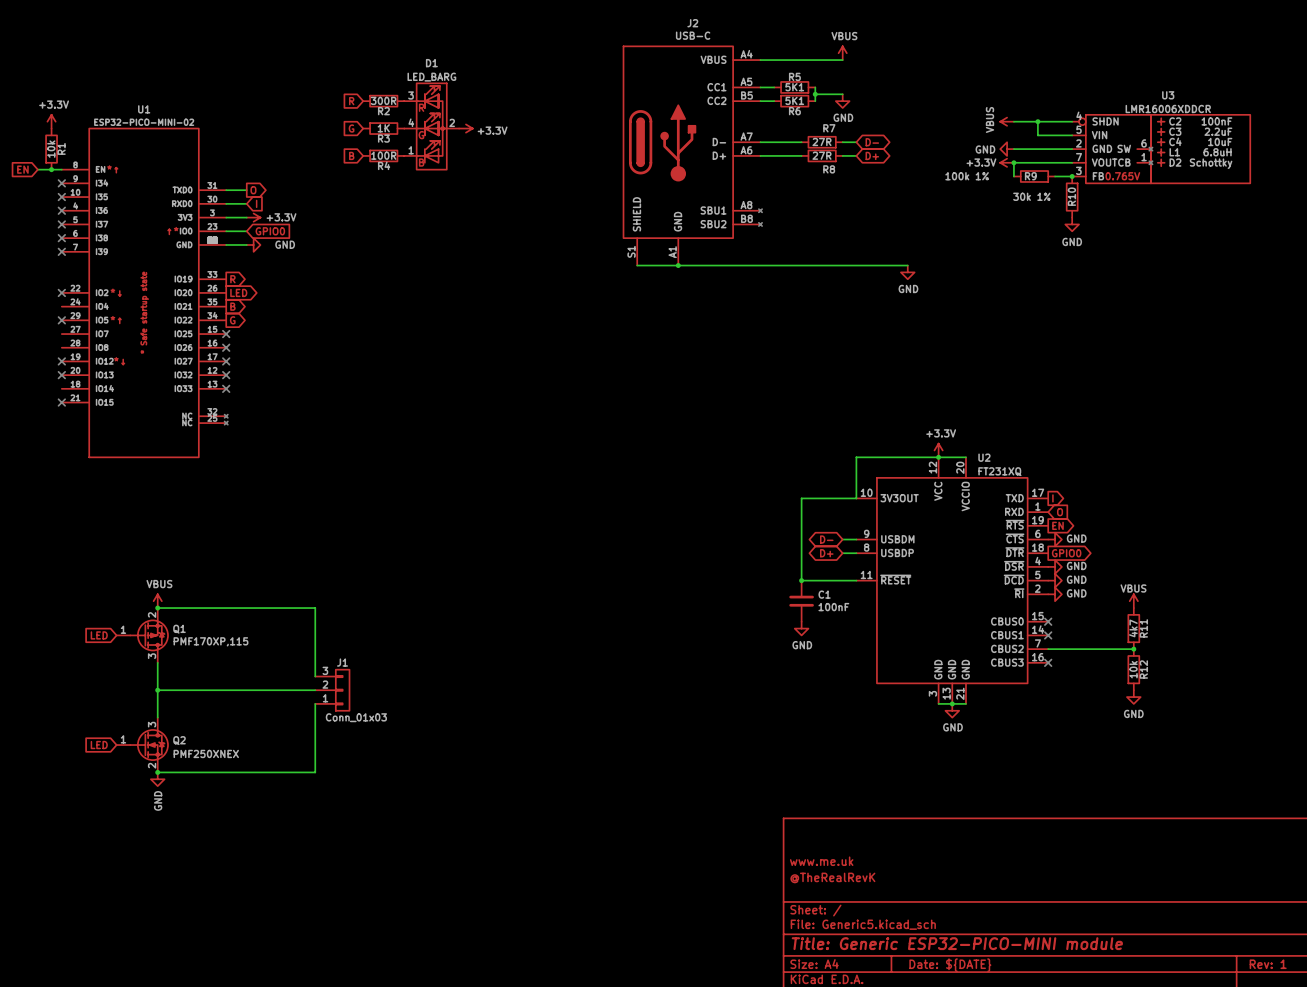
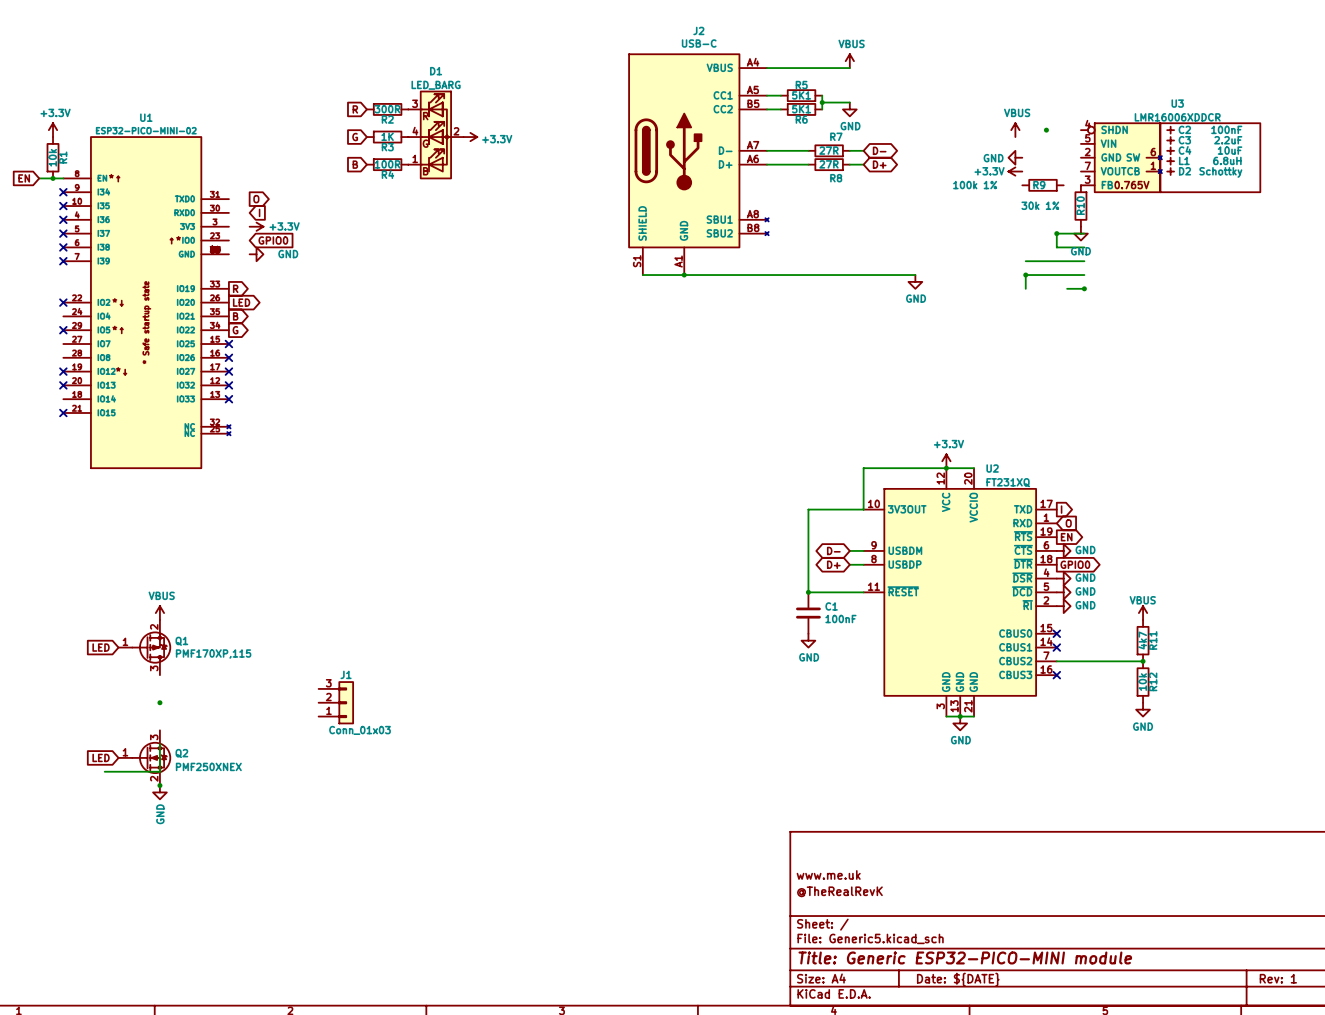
power symbol rotation: 0° (1007, 121) -> 90° clockwise (1015, 130)
wire: (1013, 121) (1072, 121) -> none
wire: (1037, 121) (1037, 135) (1072, 135) -> none
wire: (1013, 149) (1072, 149) -> (1025, 261) (1084, 261)
junction: (1013, 162) -> none
wire: (1072, 162) (1013, 162) (1013, 176) -> (1084, 275) (1025, 275) (1025, 288)
wire: (1055, 176) (1072, 176) -> (1067, 288) (1084, 288)
junction: (1072, 176) -> none
wire: (226, 190) (246, 190) -> none
wire: (226, 203) (246, 203) -> none
wire: (226, 217) (246, 217) -> none
junction: none -> (1056, 233)
wire: none -> (1084, 233) (1056, 233) (1056, 247) (1084, 247)
wire: (226, 231) (246, 231) -> none
wire: (226, 244) (246, 244) -> none
junction: none -> (1025, 275)
junction: none -> (1084, 288)
wire: (157, 608) (315, 608) (315, 676) -> none
junction: (157, 608) -> none
wire: (157, 662) (157, 717) -> none
wire: (157, 690) (315, 690) -> none
wire: (315, 703) (315, 772) (157, 772) -> none
wire: none -> (159, 744) (159, 771) (104, 771)

